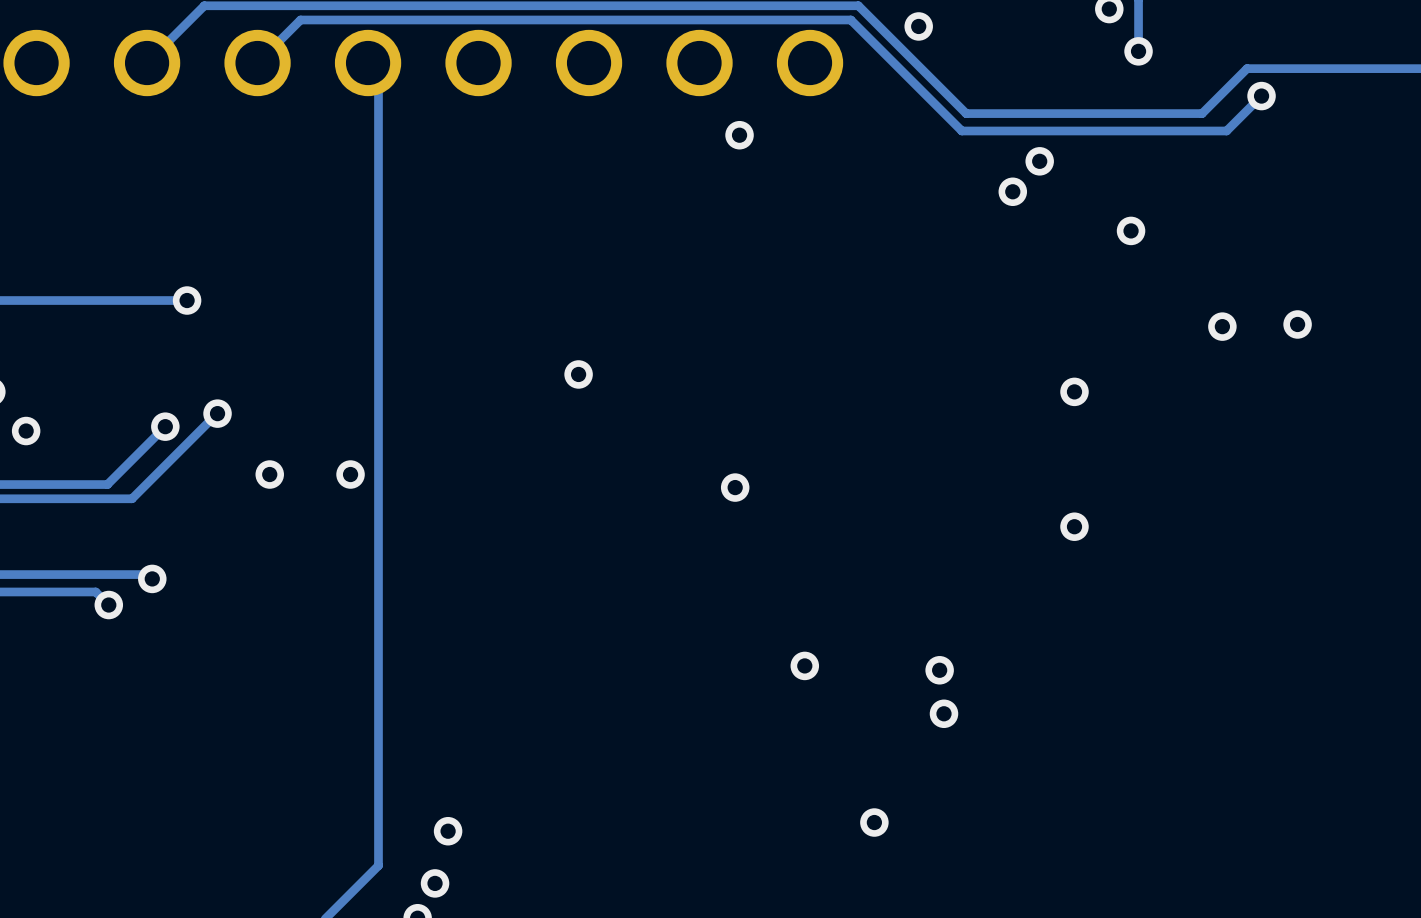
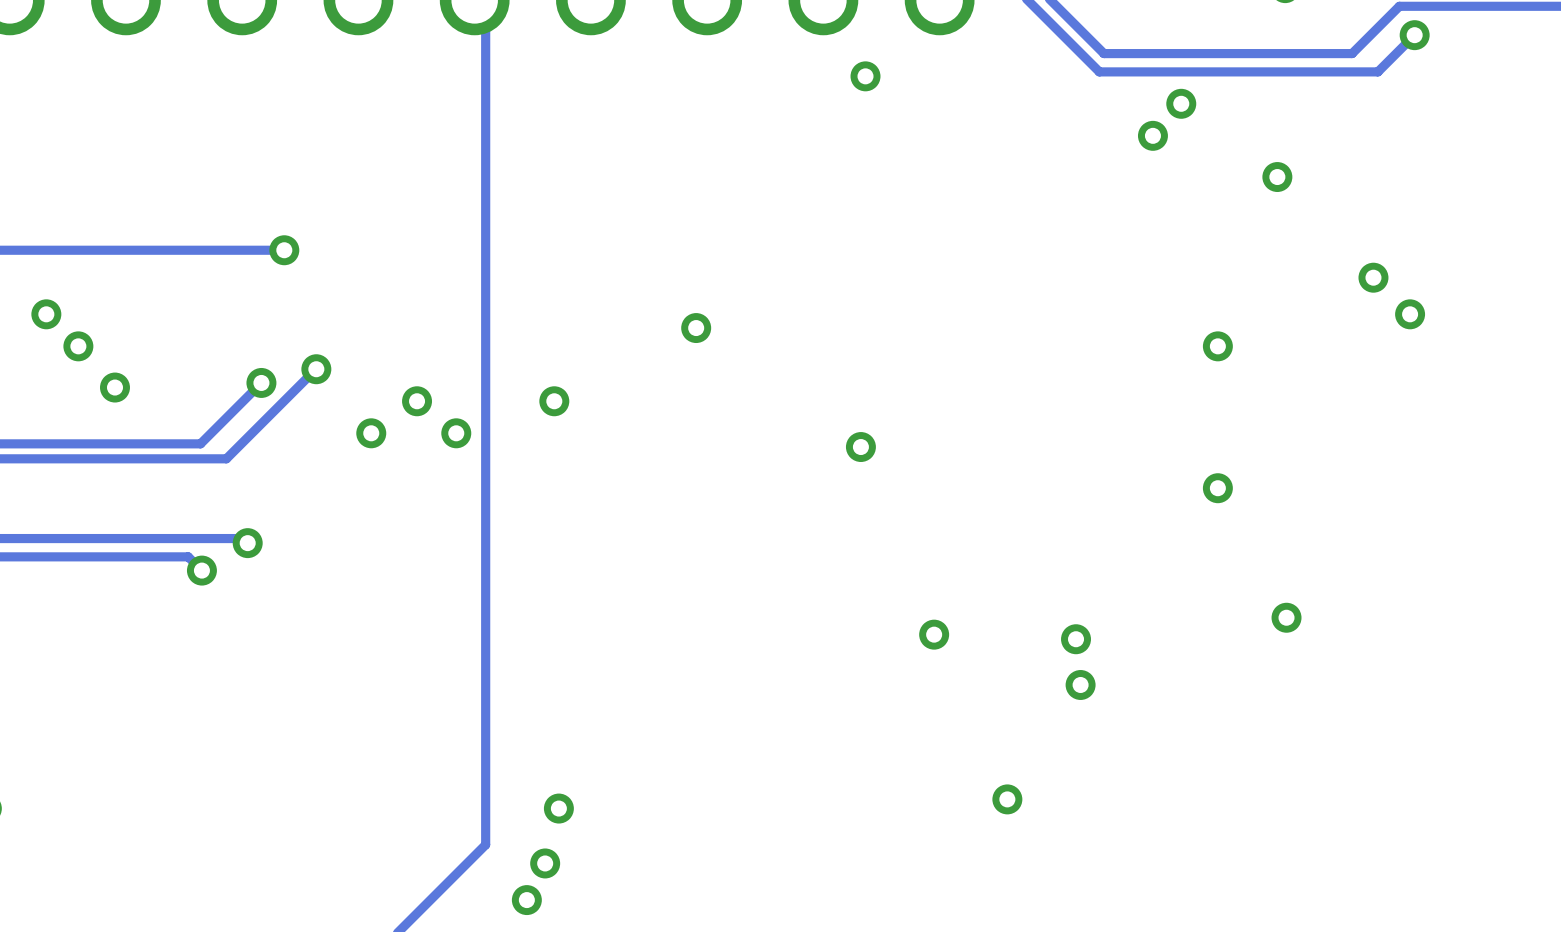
via position: (1297, 324) -> (1410, 314)
via: none -> (417, 401)
via: none -> (554, 401)
via: none -> (1286, 617)

